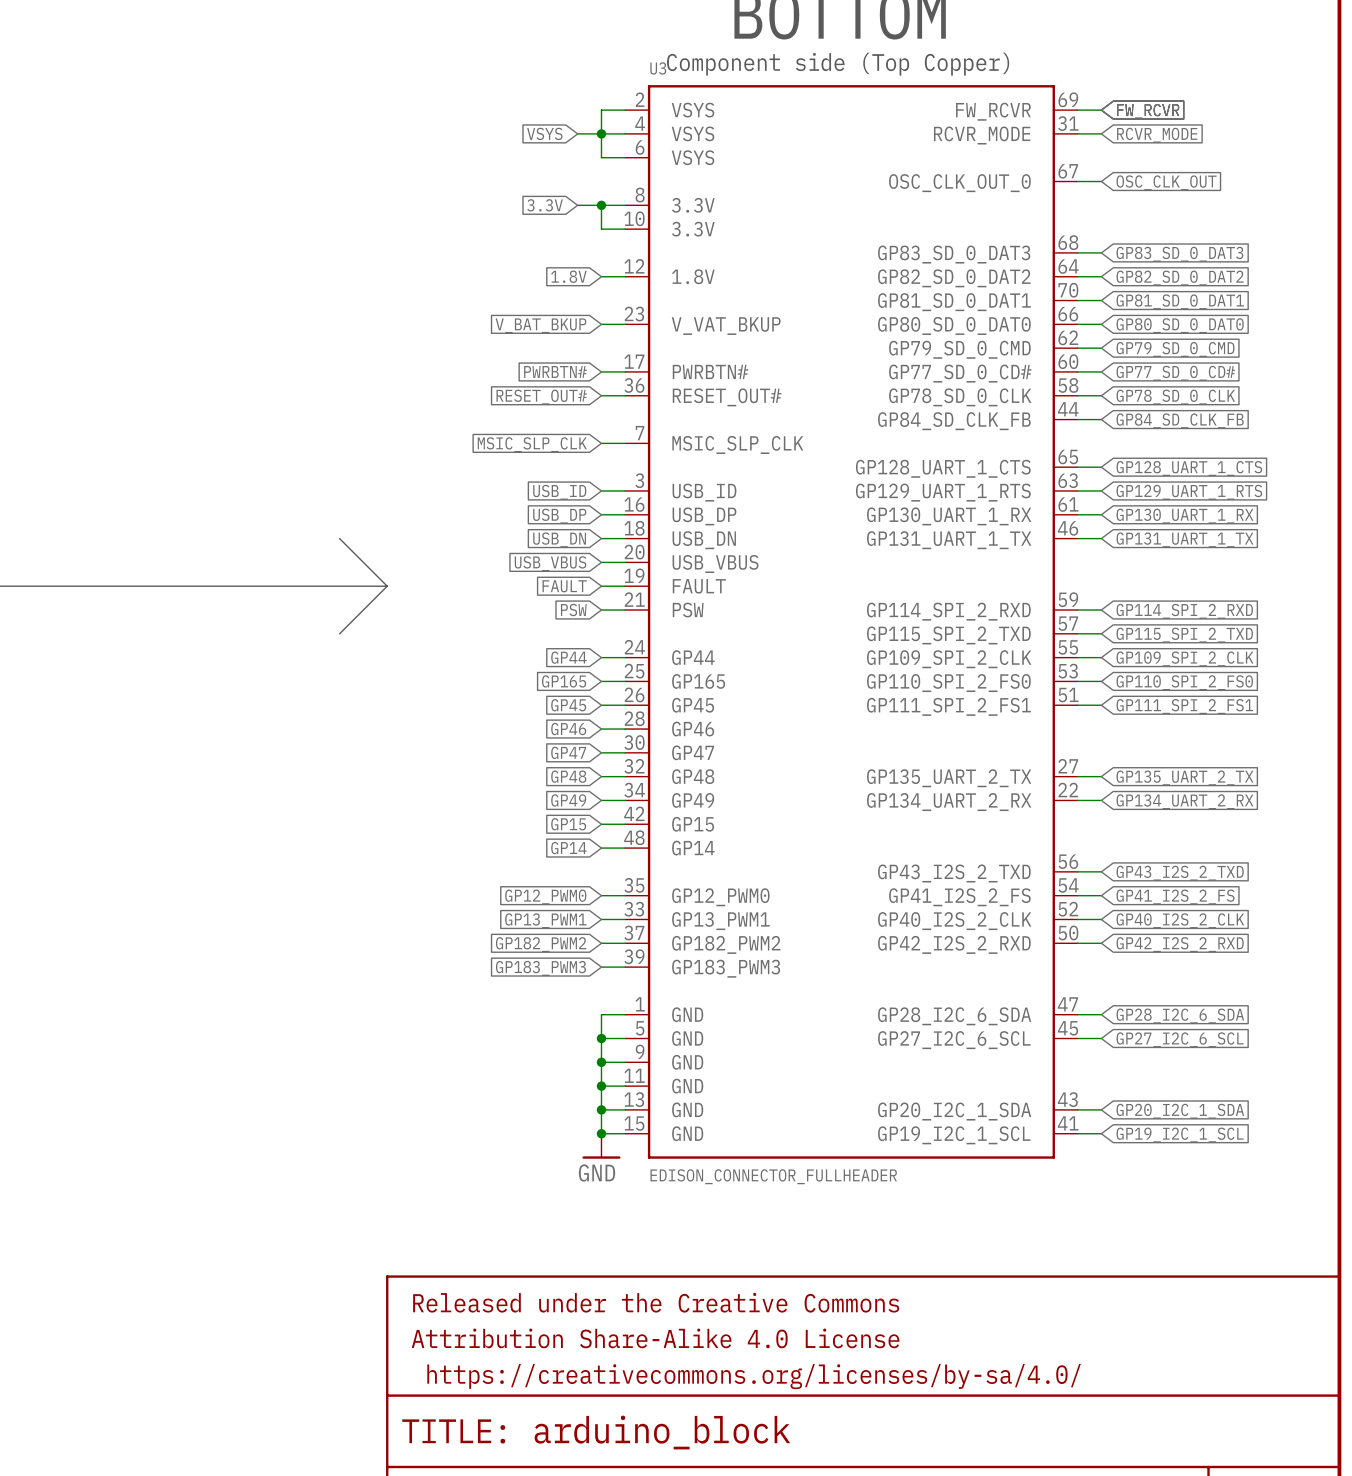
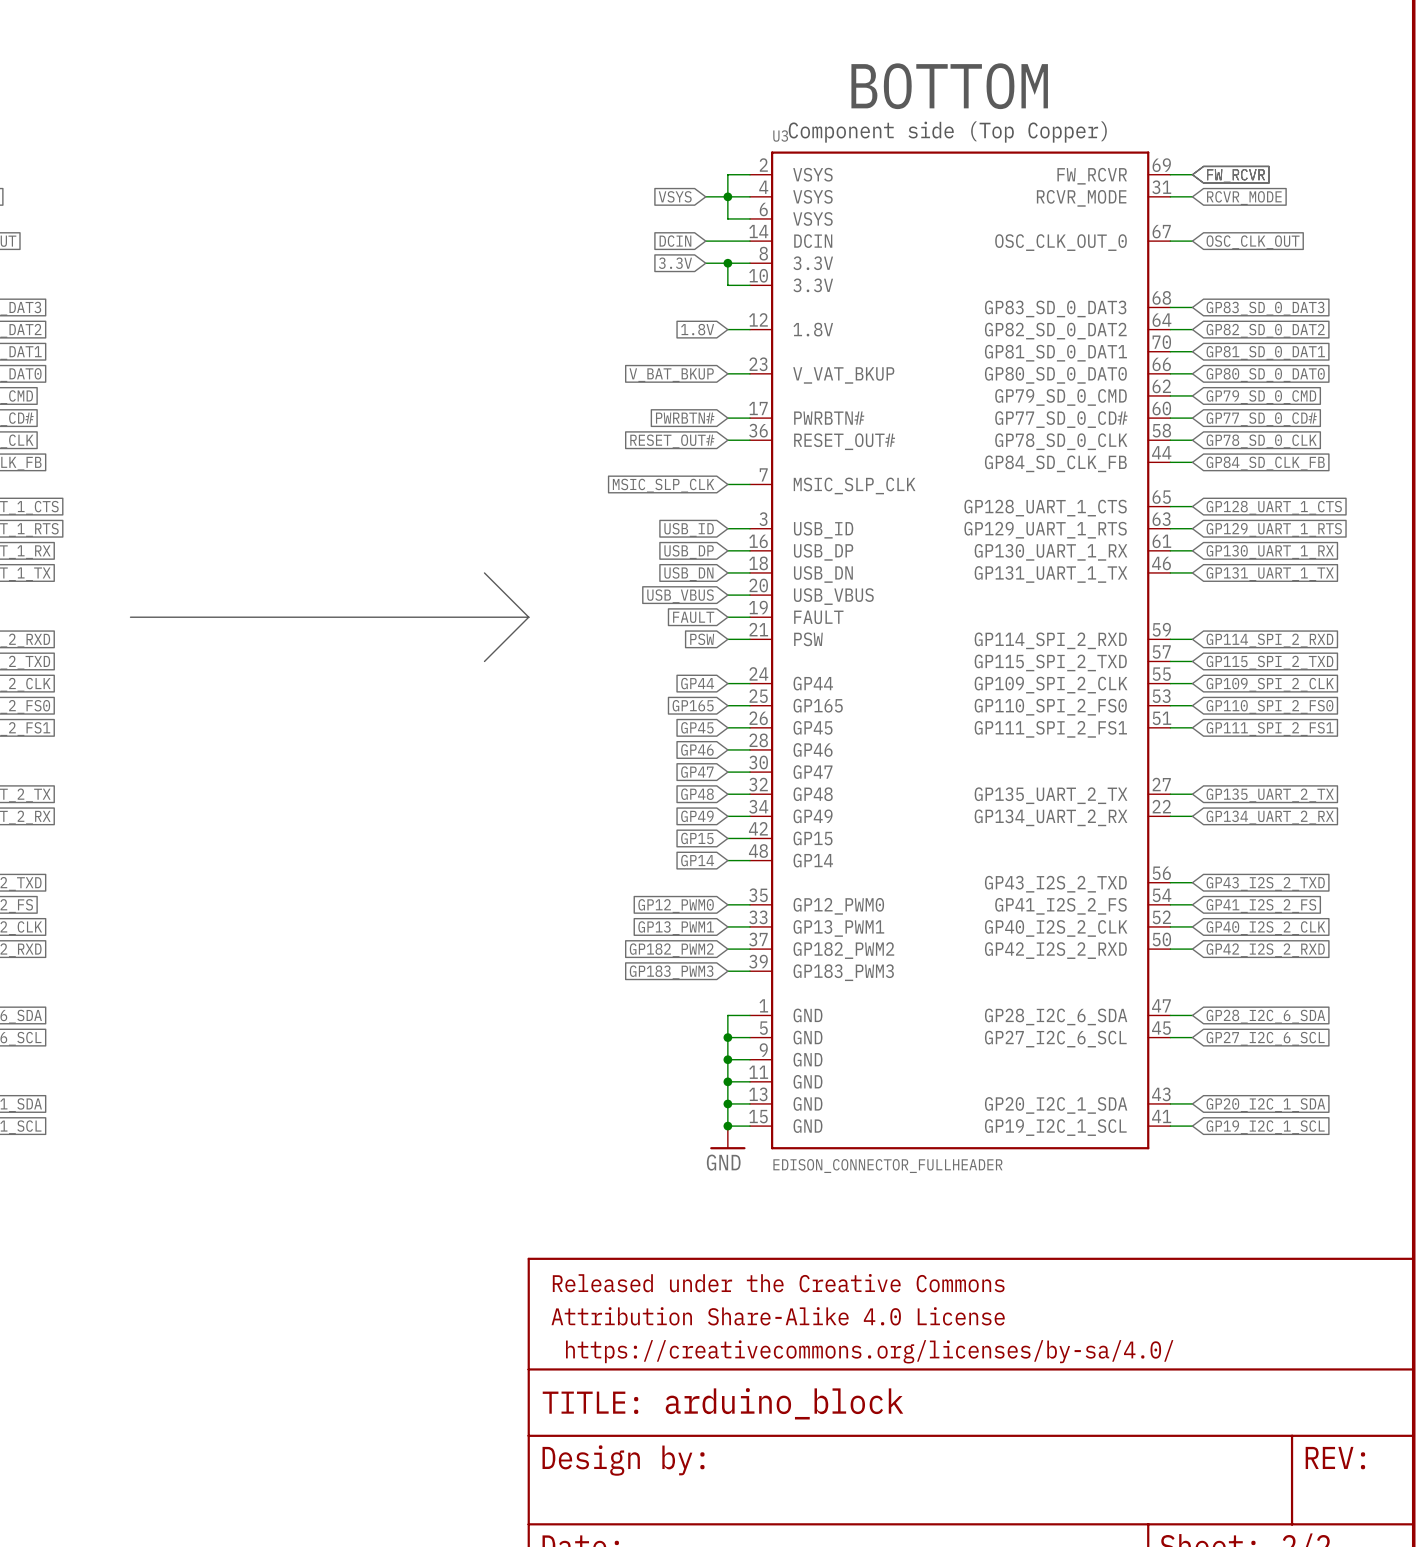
U3 symbol: [625, 85, 1078, 1159] -> [749, 151, 1171, 1150]
global label: none -> DCIN (675, 241)
wire: none -> (705, 241) (749, 241)

